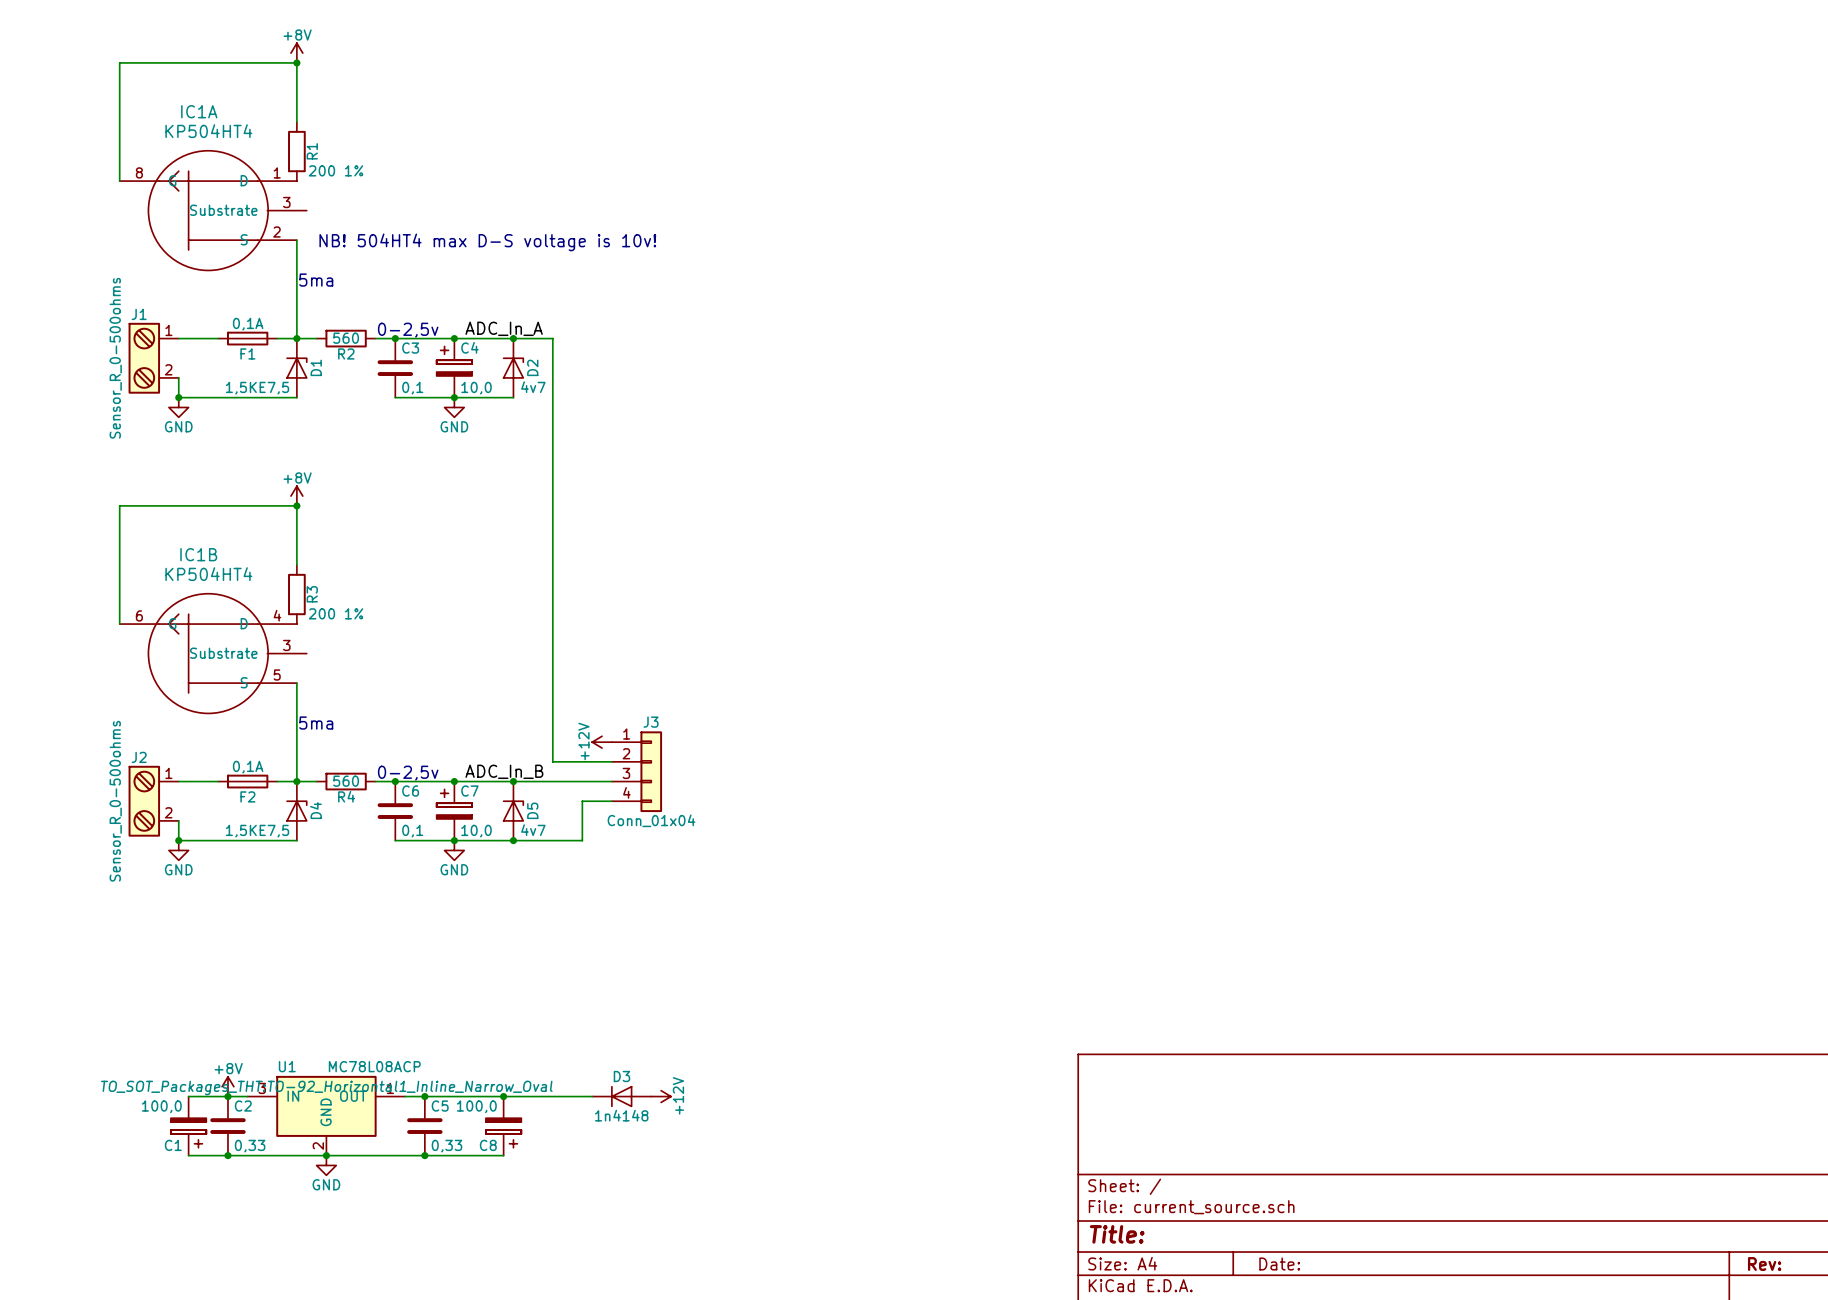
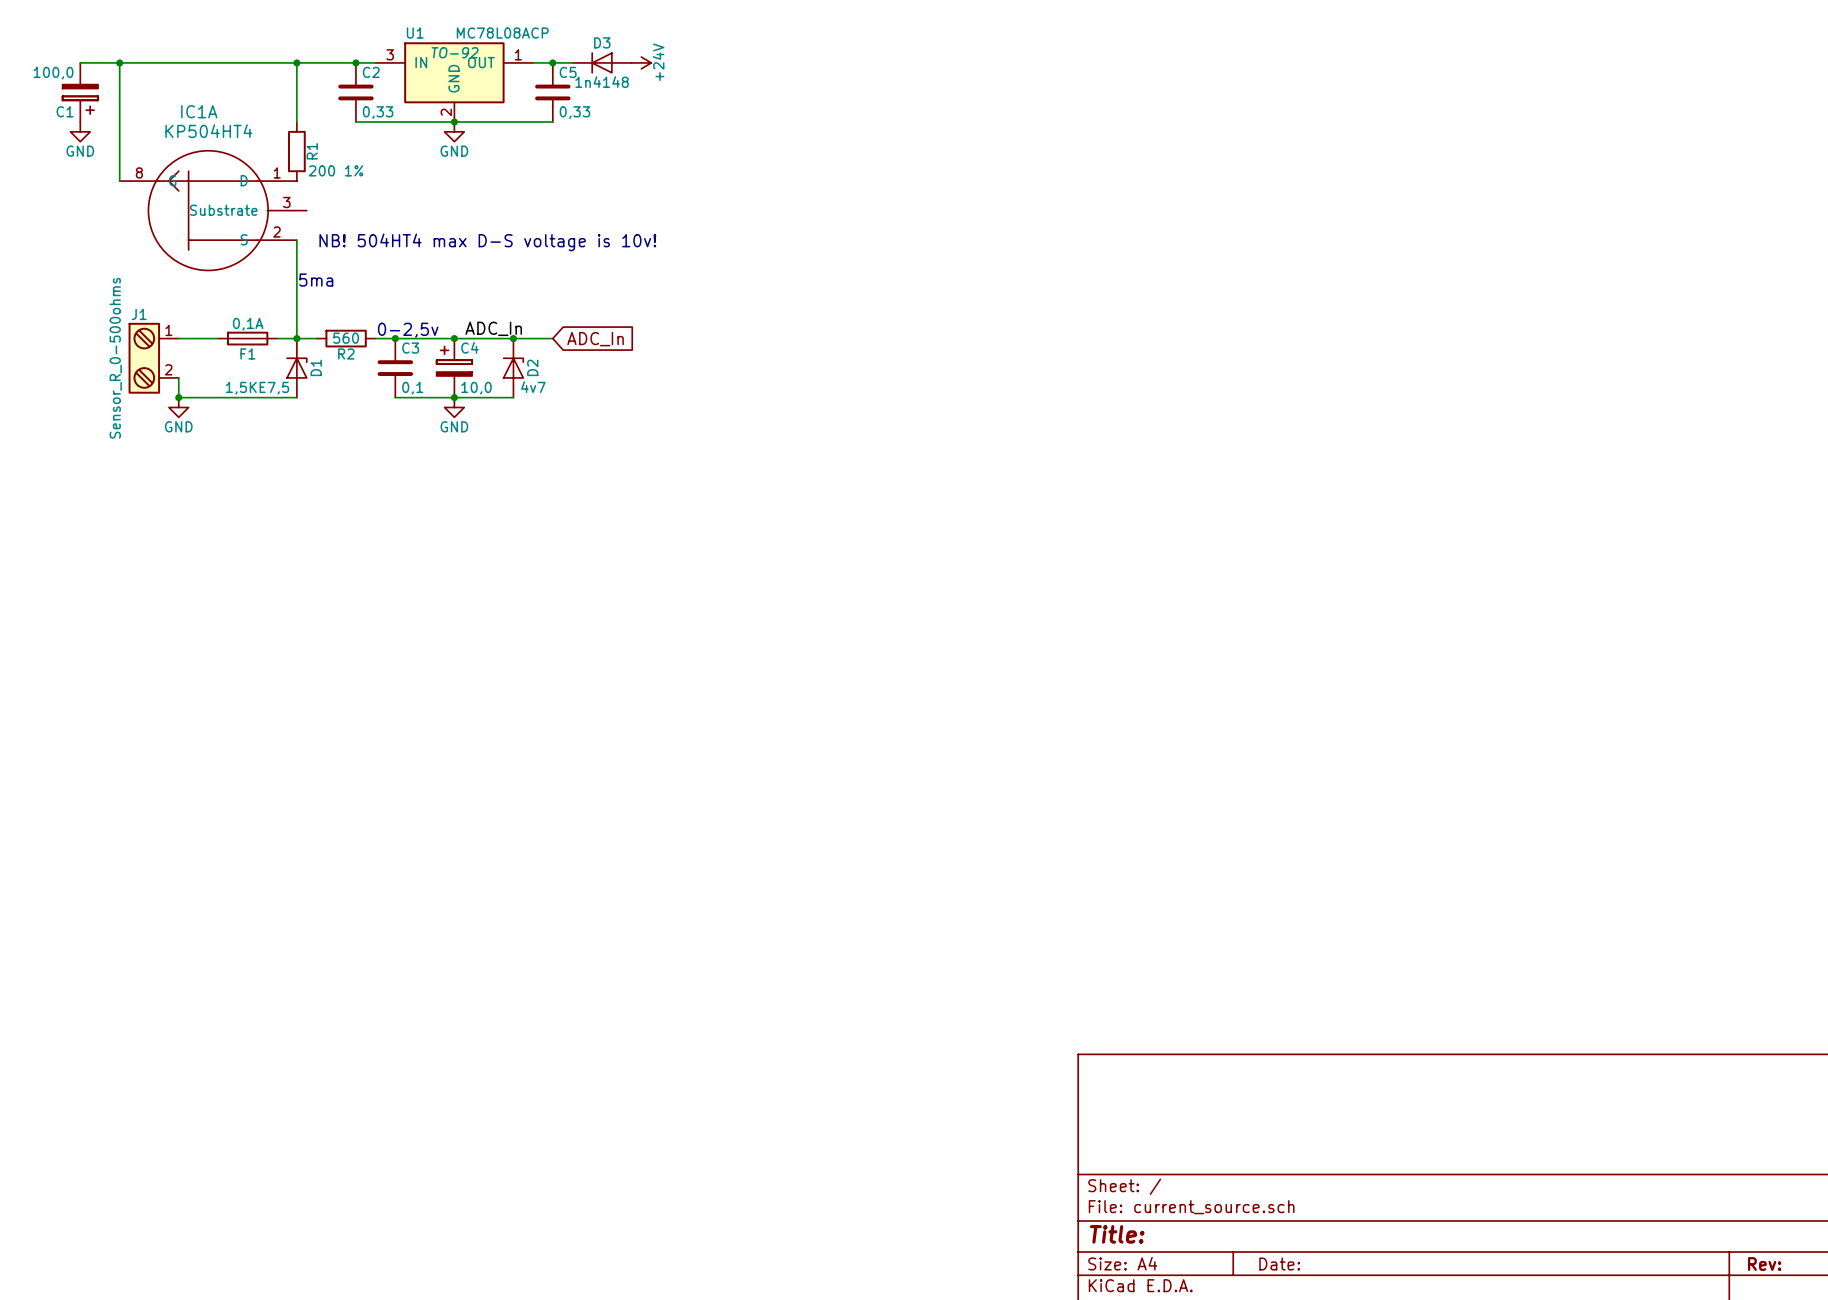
power symbol: +8V (296, 53) -> none
wire: none -> (80, 62) (119, 62)
junction: none -> (119, 62)
wire: none -> (296, 62) (375, 62)
junction: none -> (355, 62)
wire: none -> (533, 62) (572, 62)
junction: none -> (552, 62)
power symbol: none -> +24V (641, 62)
wire: none -> (355, 122) (552, 122)
junction: none -> (454, 122)
power symbol: none -> GND (80, 131)
power symbol: none -> GND (454, 131)
label: ADC_In_A (504, 328) -> ADC_In (493, 328)
wire: (552, 338) (552, 761) (611, 761) -> none
global label: none -> ADC_In (595, 339)
power symbol: +8V (296, 496) -> none
junction: (296, 505) -> none
wire: (296, 564) (296, 505) (119, 505) (119, 624) -> none
R3: 200 1% (296, 594) -> none
IC1B: КР504НТ4 (213, 653) -> none
wire: (296, 683) (296, 781) -> none
text: 5ma (316, 723) -> none
power symbol: +12V (602, 742) -> none
label: ADC_In_B (504, 771) -> none
J3: Conn_01x04 (636, 771) -> none
text: 0-2,5v (408, 773) -> none
wire: (178, 781) (218, 781) -> none
F2: 0,1A (247, 781) -> none
wire: (277, 781) (316, 781) -> none
junction: (296, 781) -> none
R4: 560 (346, 781) -> none
wire: (375, 781) (611, 781) -> none
junction: (395, 781) -> none
junction: (454, 781) -> none
junction: (513, 781) -> none
J2: Sensor_R_0-500ohms (153, 801) -> none
wire: (611, 801) (582, 801) (582, 840) (395, 840) -> none
D4: 1,5KE7,5 (296, 811) -> none
C6: 0,1 (395, 811) -> none
C7: 10,0 (454, 811) -> none
D5: 4v7 (513, 811) -> none
wire: (178, 820) (178, 840) (296, 840) -> none
junction: (178, 840) -> none
junction: (454, 840) -> none
junction: (513, 840) -> none
power symbol: GND (178, 850) -> none
power symbol: GND (454, 850) -> none
power symbol: +8V (227, 1086) -> none
U1 text: TO_SOT_Packages_THT:TO-92_Horizontal1_Inline_Narrow_Oval (326, 1087) -> TO-92 (455, 52)
wire: (188, 1096) (247, 1096) -> none
junction: (227, 1096) -> none
wire: (405, 1096) (592, 1096) -> none
junction: (424, 1096) -> none
junction: (503, 1096) -> none
D3 position: (621, 1096) -> (602, 62)
power symbol: +12V (661, 1096) -> none
U1 position: (326, 1115) -> (454, 82)
C1 position: (188, 1126) -> (80, 92)
C2 position: (227, 1126) -> (355, 92)
C5 position: (424, 1126) -> (552, 92)
C8: 100,0 (503, 1126) -> none
wire: (188, 1155) (503, 1155) -> none
junction: (227, 1155) -> none
junction: (326, 1155) -> none
junction: (424, 1155) -> none
power symbol: GND (326, 1165) -> none

